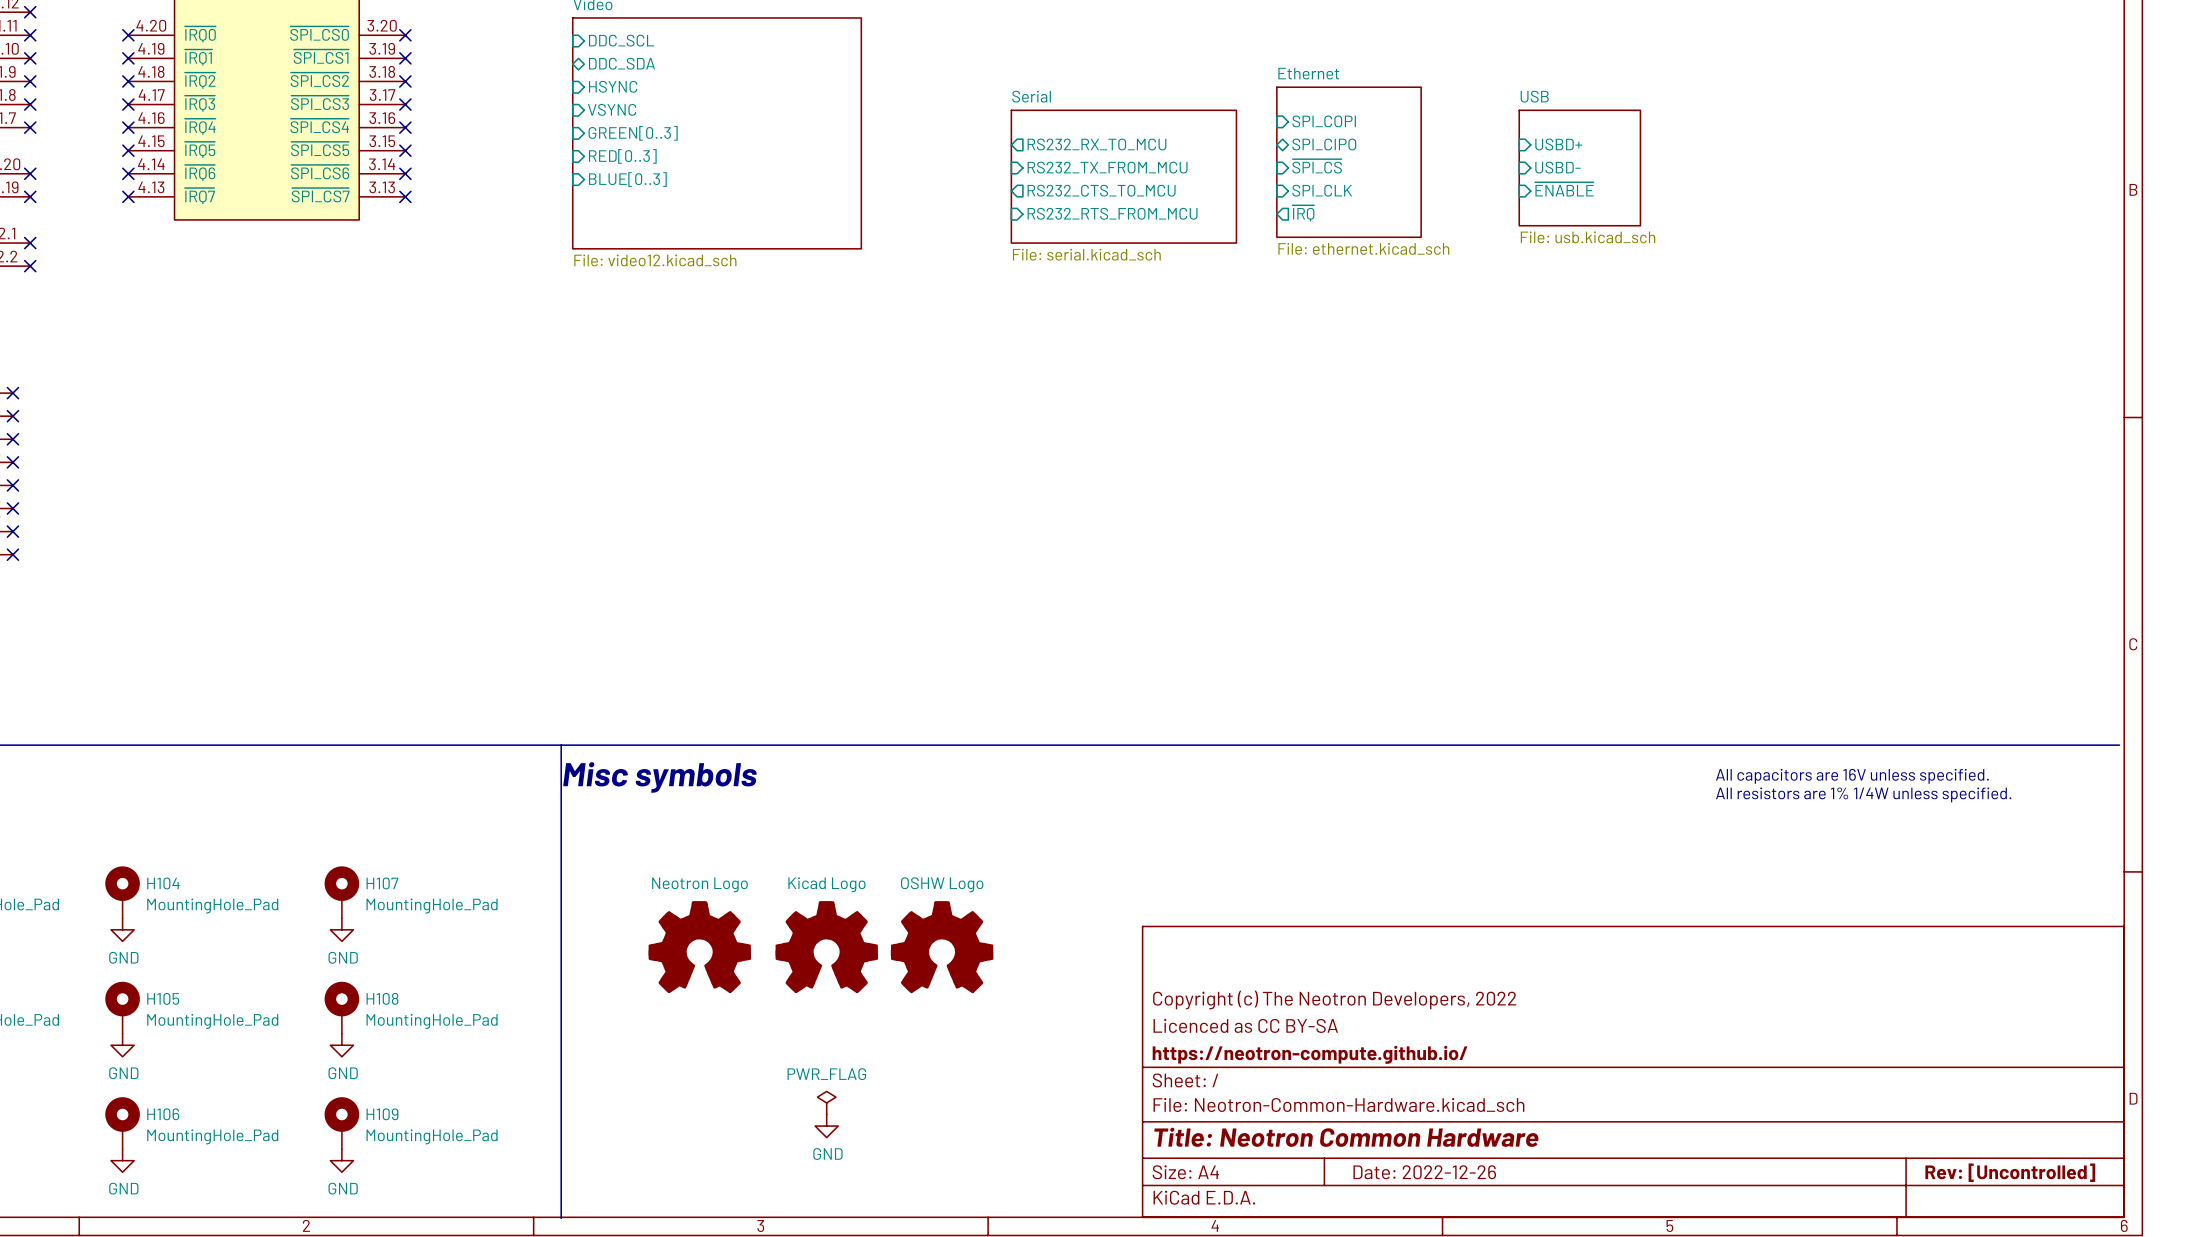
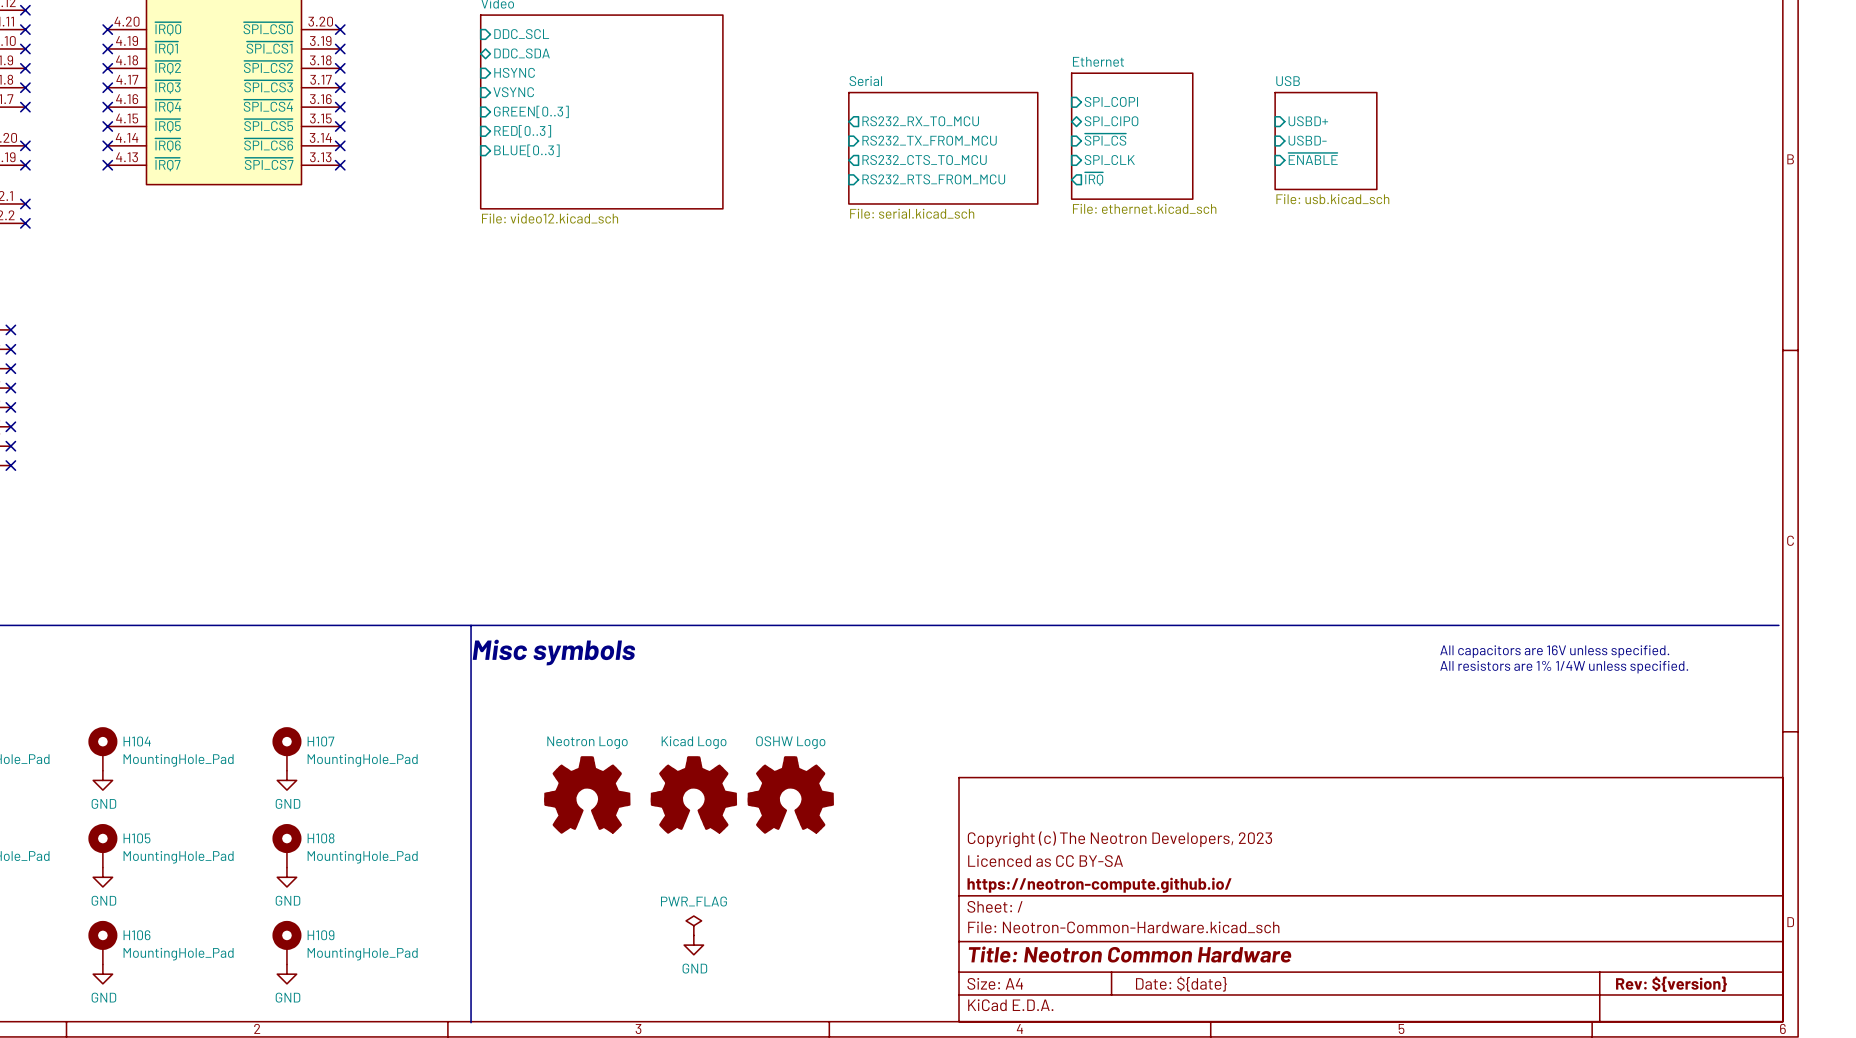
title block: Copyright (c) The Neotron Developers, 2022 (1334, 1000) -> Copyright (c) The Neotron Developers, 2023 (1119, 839)
title block: Date: 2022-12-26 (1424, 1172) -> Date: ${date} (1181, 984)
title block: Rev: [Uncontrolled] (2010, 1172) -> Rev: ${version} (1671, 984)

